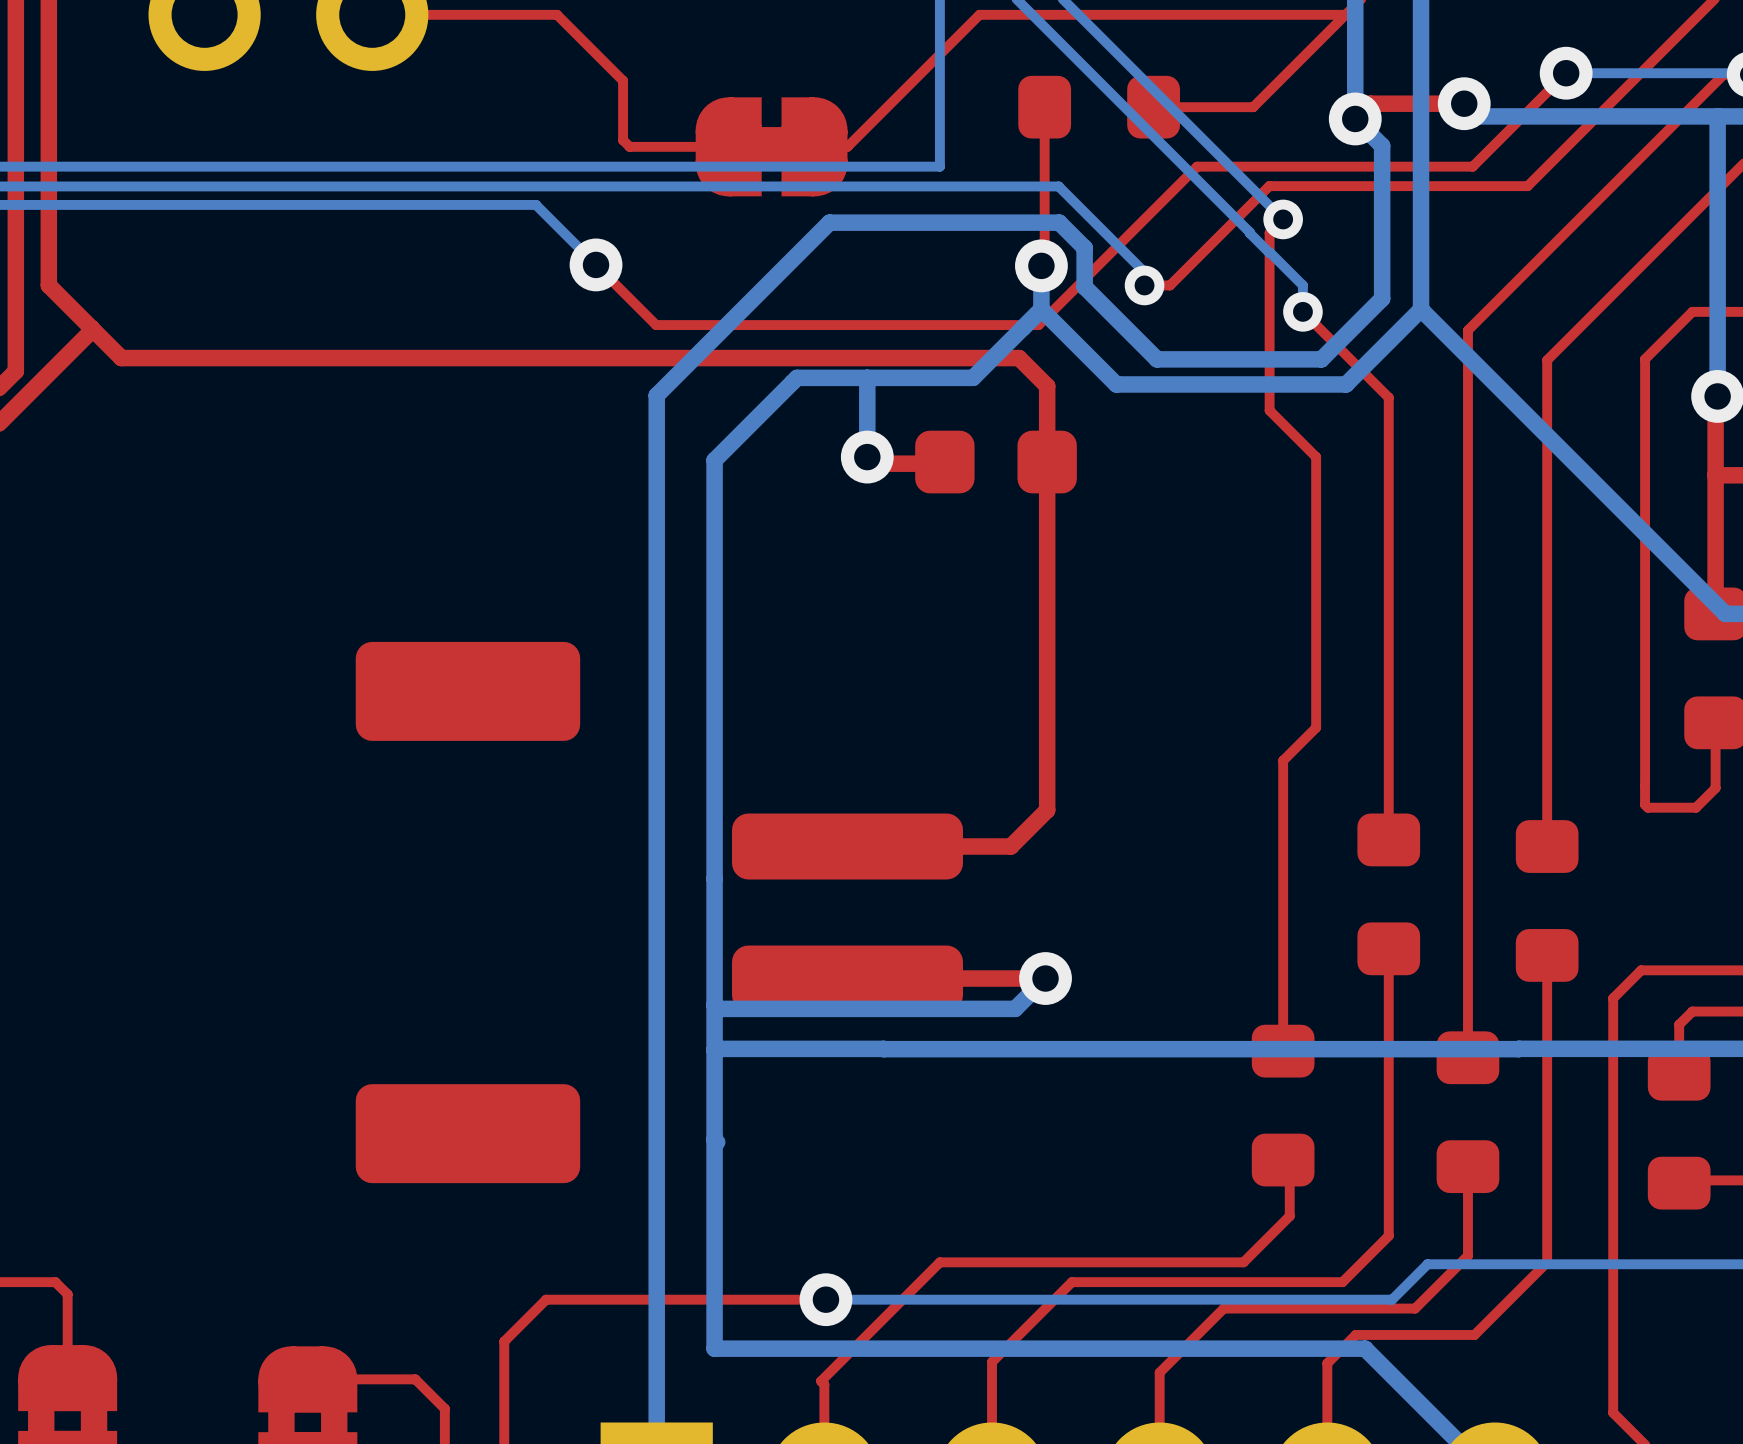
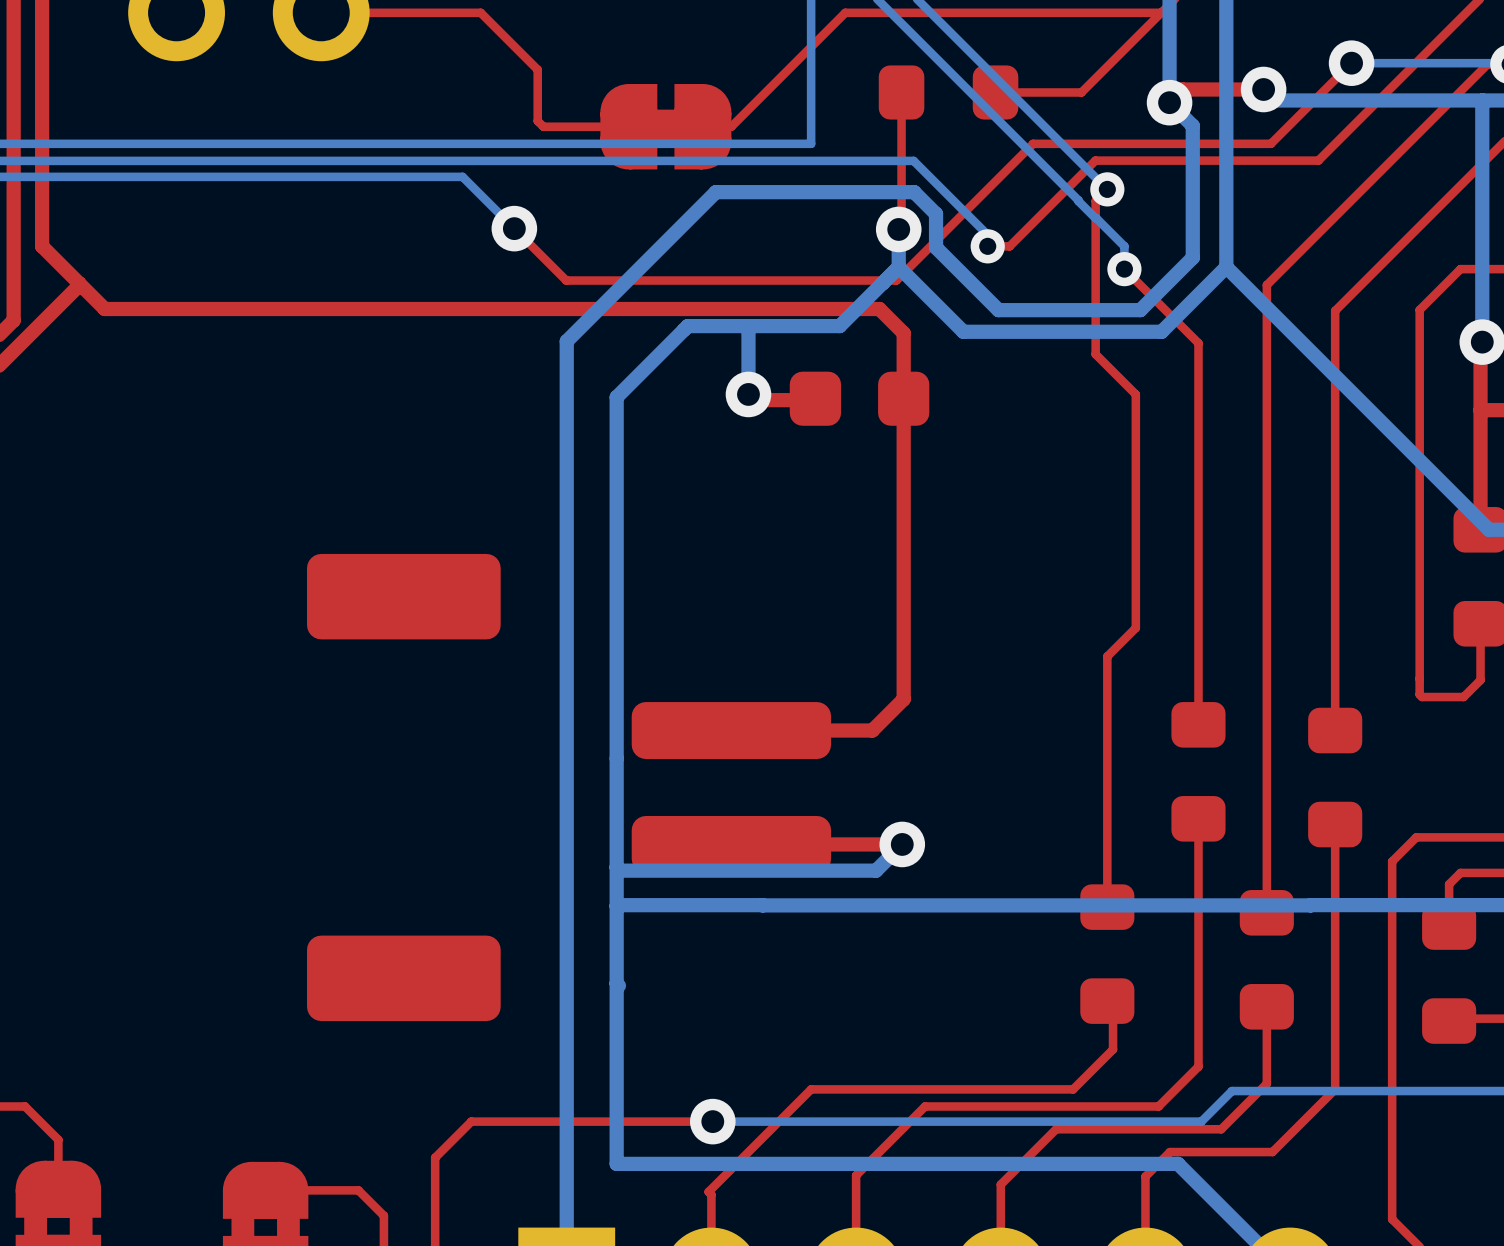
top track: (29, 1282) (55, 1282) (67, 1294) (67, 1320) -> (25, 1106) (58, 1139)

